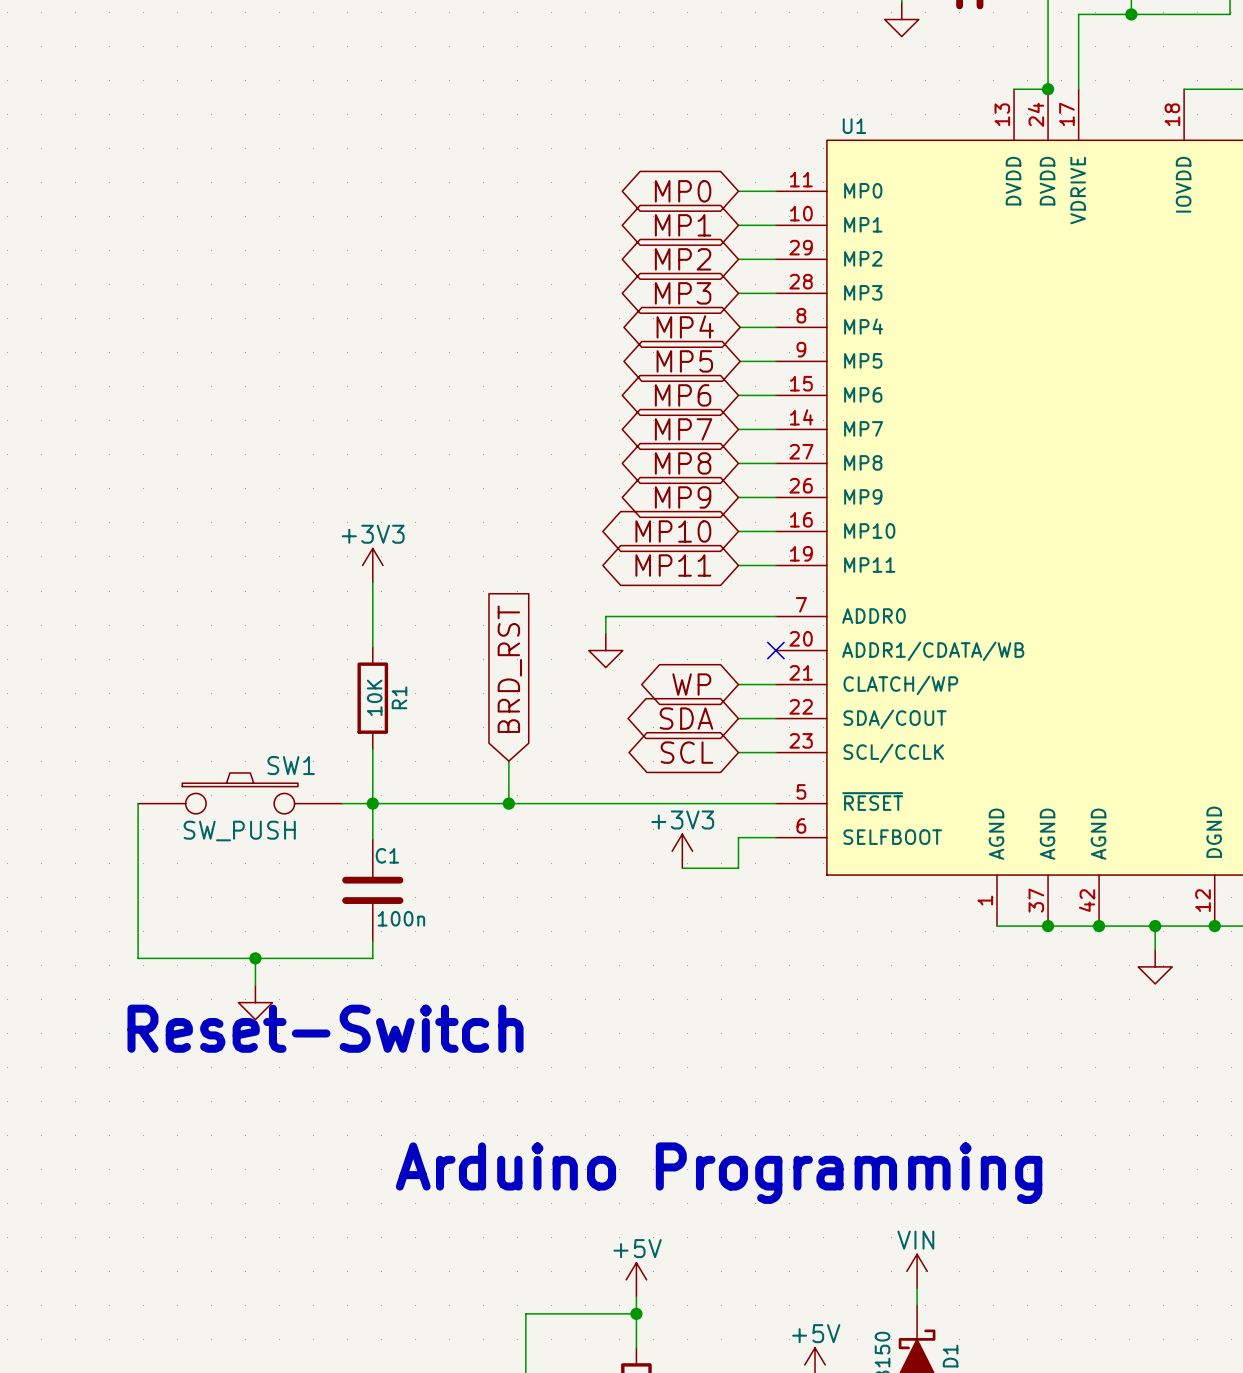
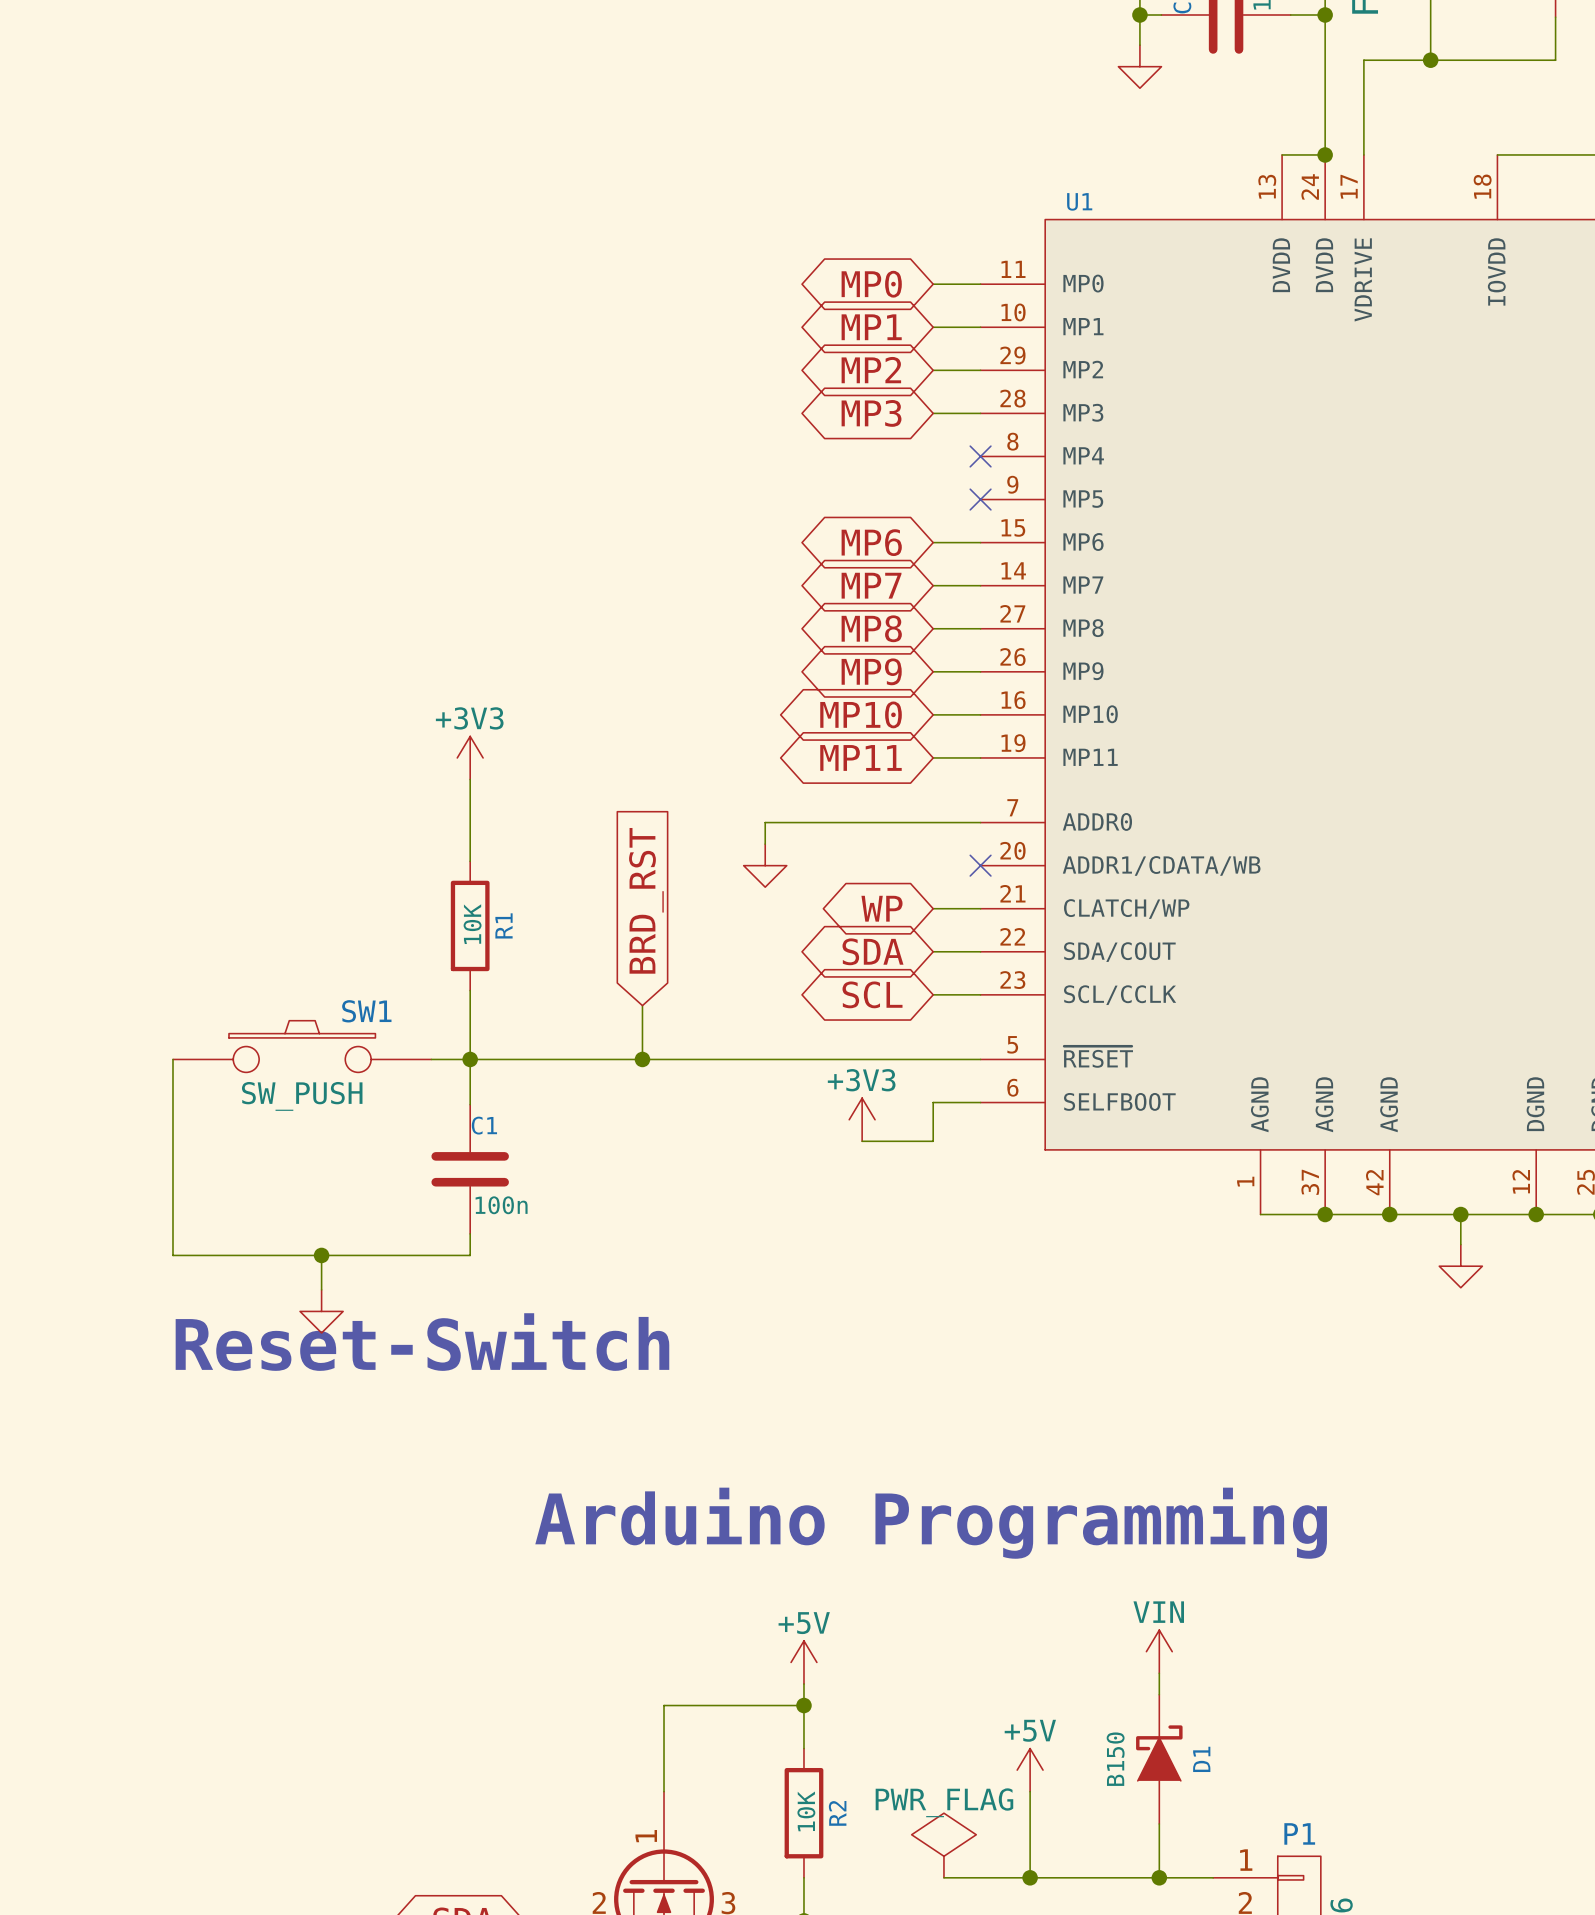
global label: MP4 (685, 326) -> none
wire: (740, 327) (775, 327) -> none
no-connect mark: none -> (980, 456)
global label: MP5 (684, 361) -> none
wire: (740, 361) (775, 361) -> none
no-connect mark: none -> (980, 499)

